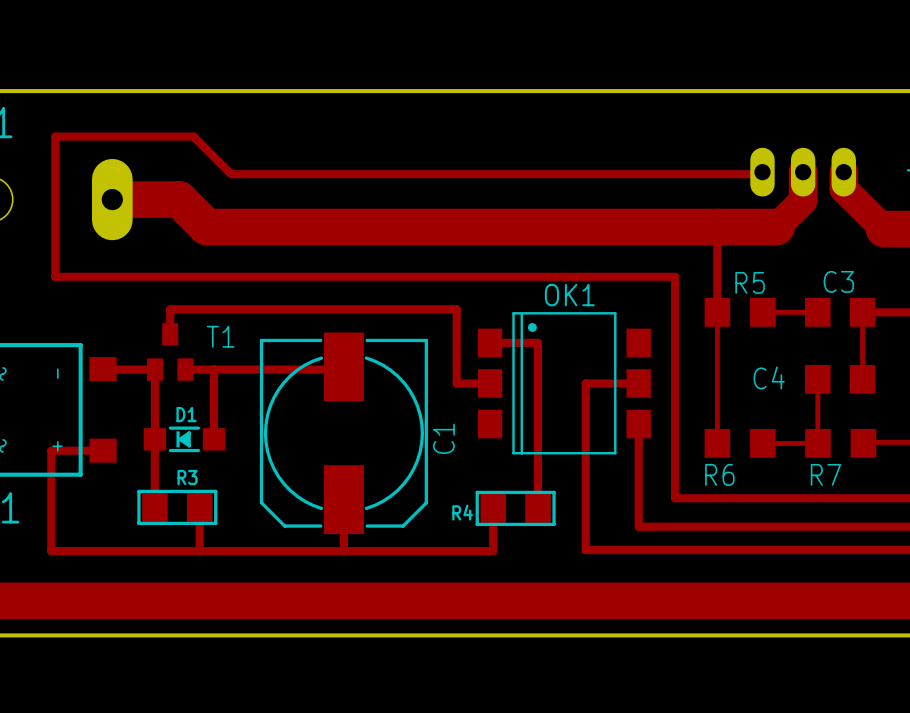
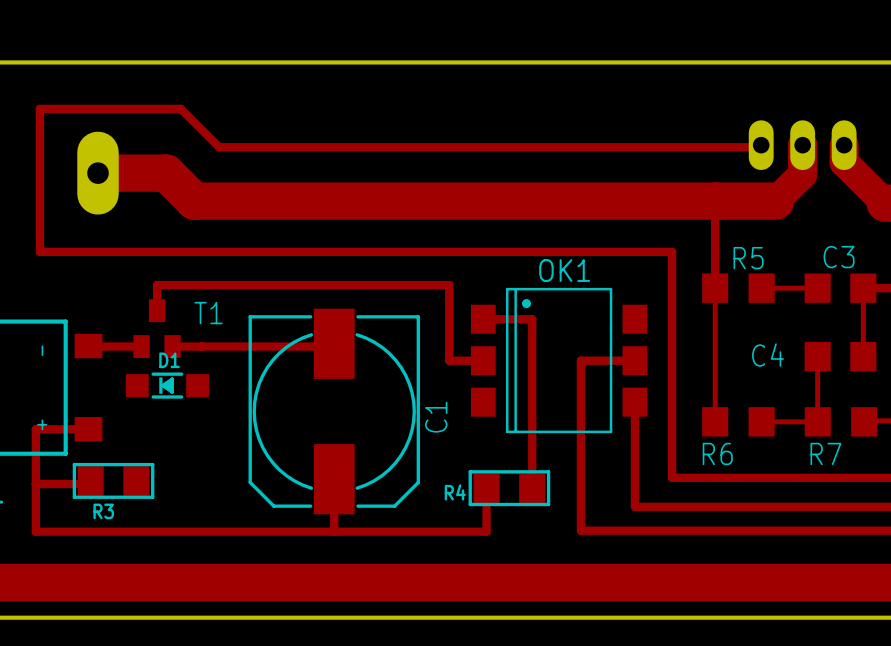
track: (155, 369) (155, 439) -> none
track: (214, 369) (214, 439) -> none
track: (154, 439) (154, 507) -> none
D1 position: (184, 439) -> (167, 385)
R3 name position: R3 (187, 477) -> R3 (103, 511)
track: none -> (90, 480) (90, 484) (35, 484)
track: (199, 506) (199, 551) -> none
R3 position: (177, 507) -> (113, 480)

